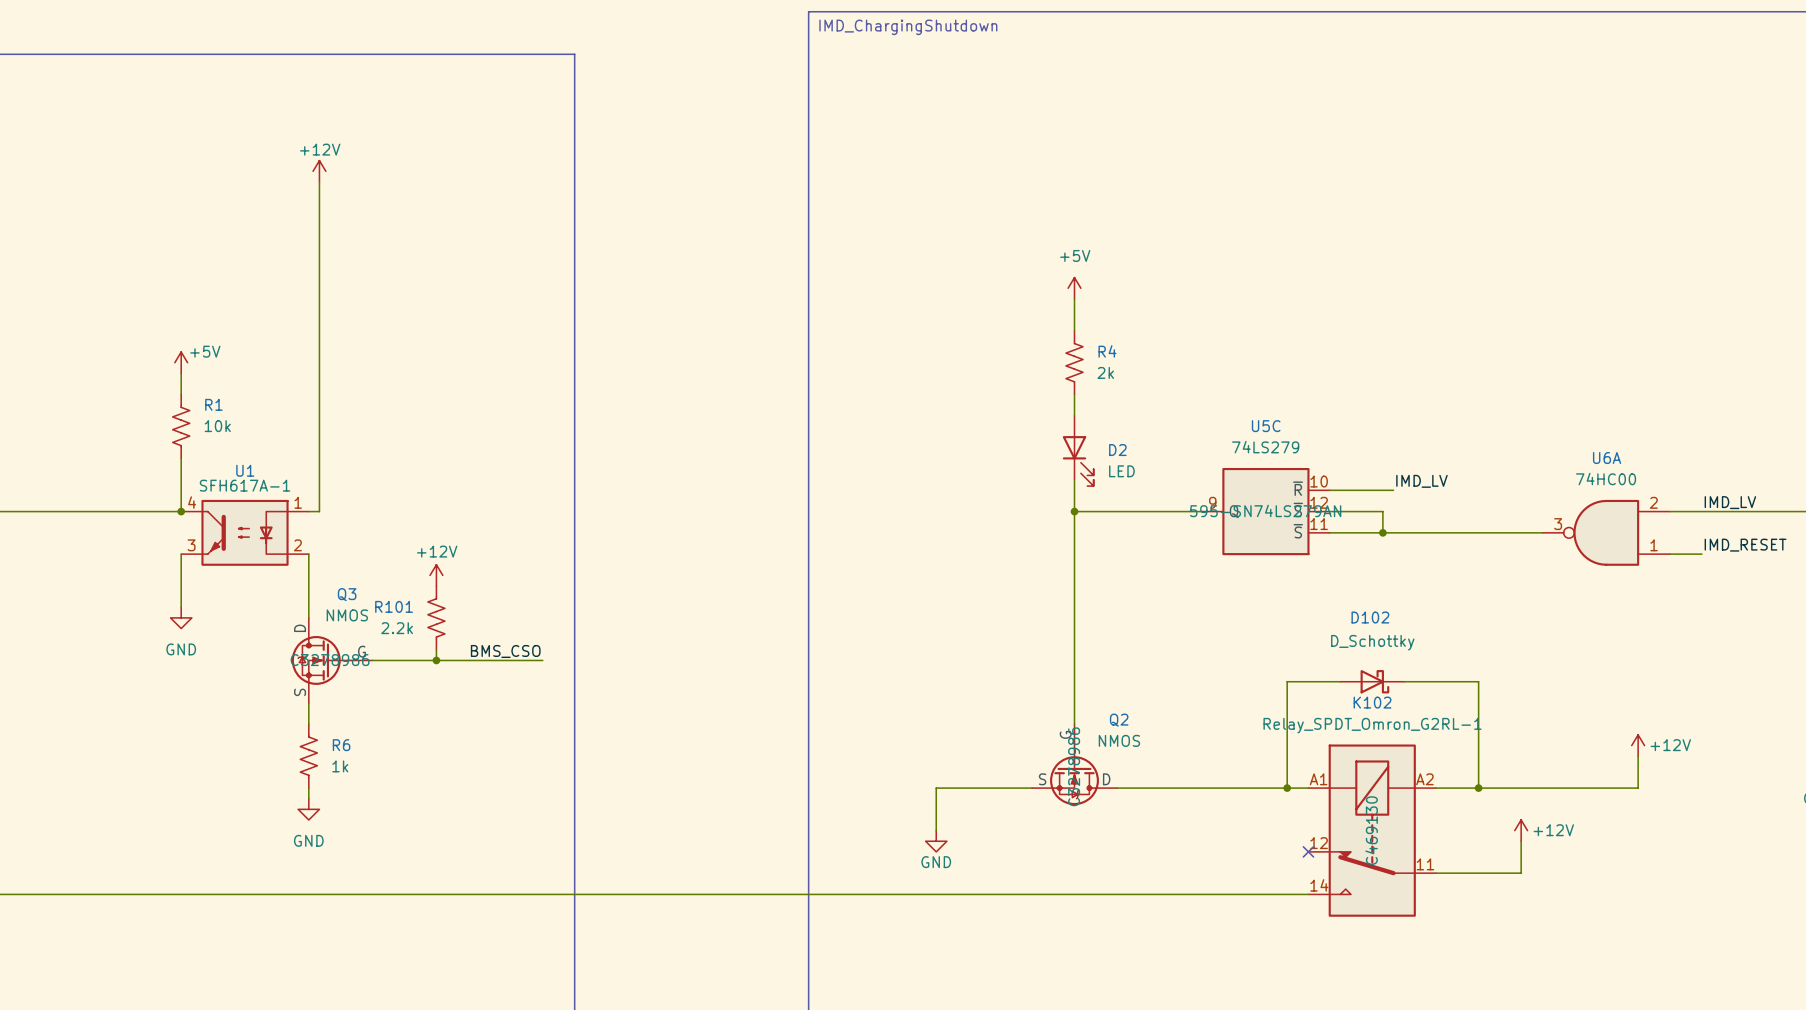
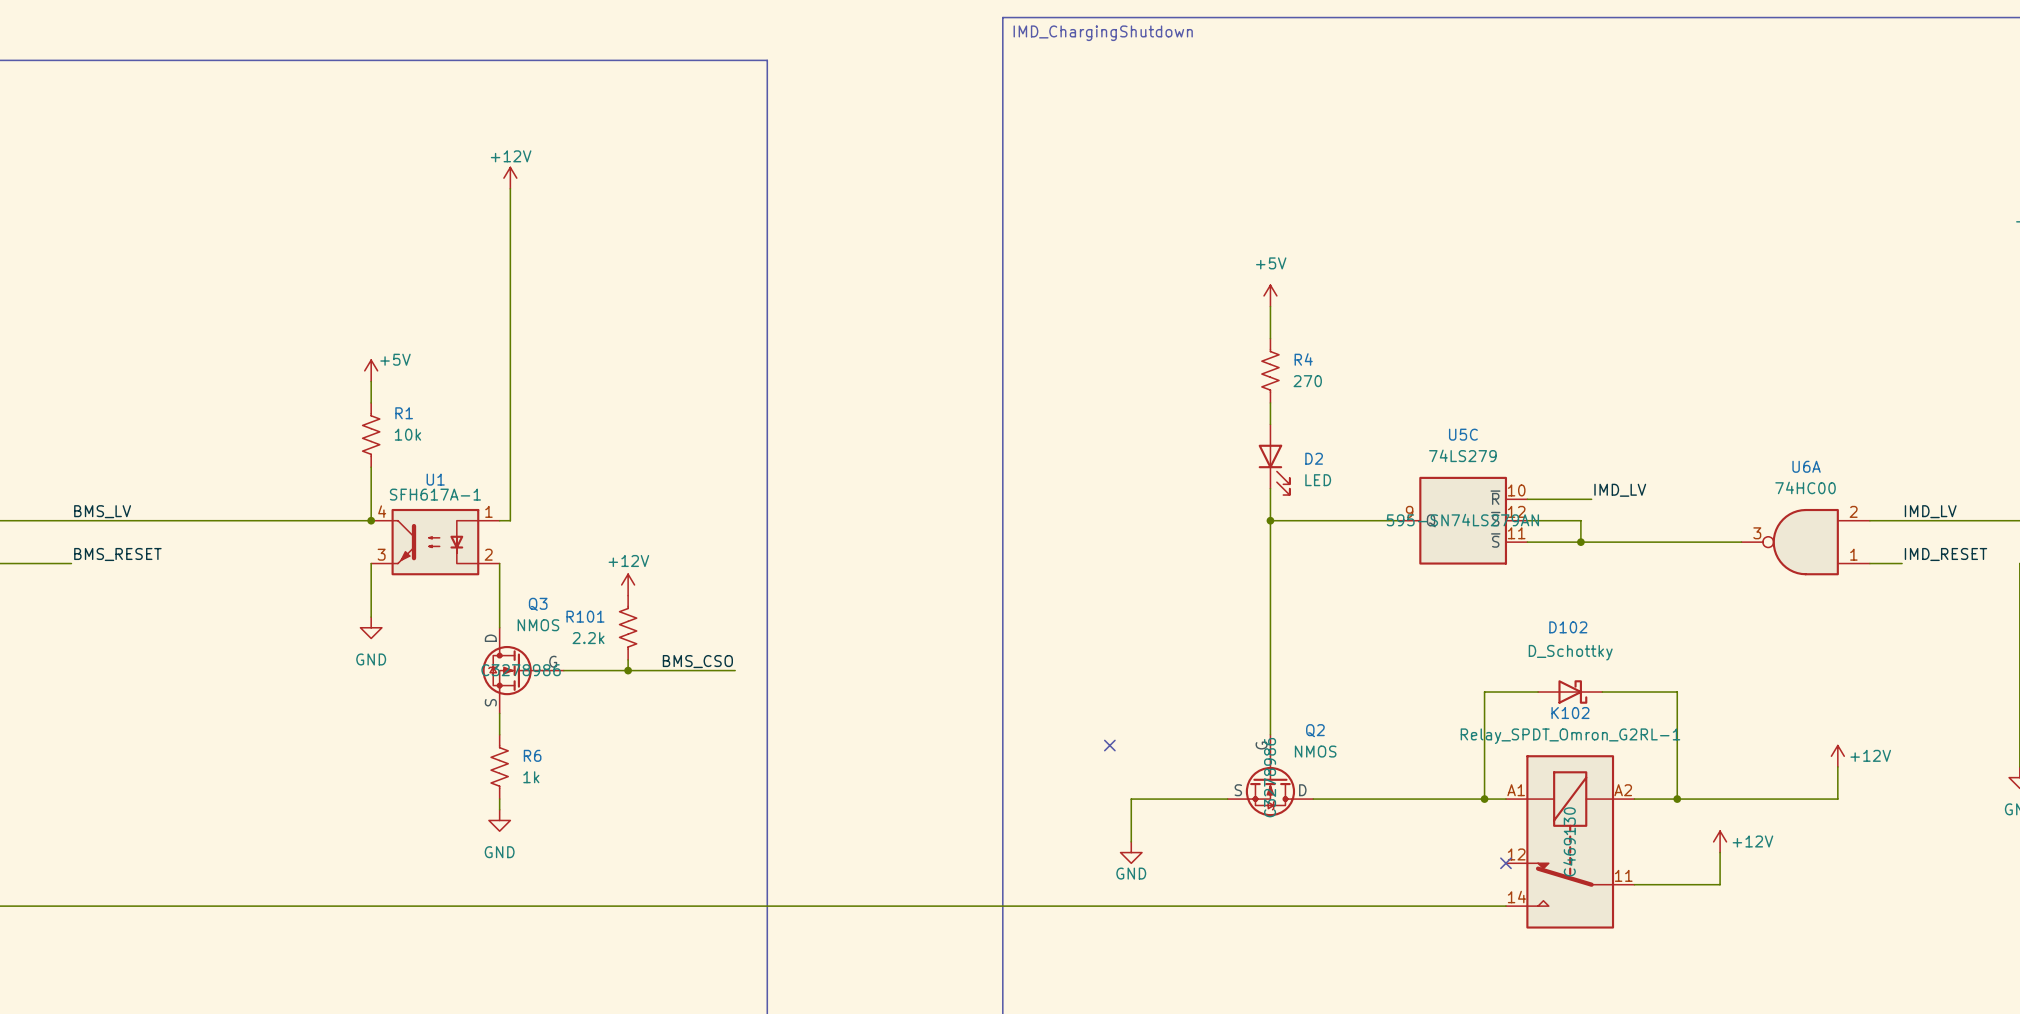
R4 value: 2k (1105, 372) -> 270 (1307, 381)
no-connect mark: none -> (1109, 745)

